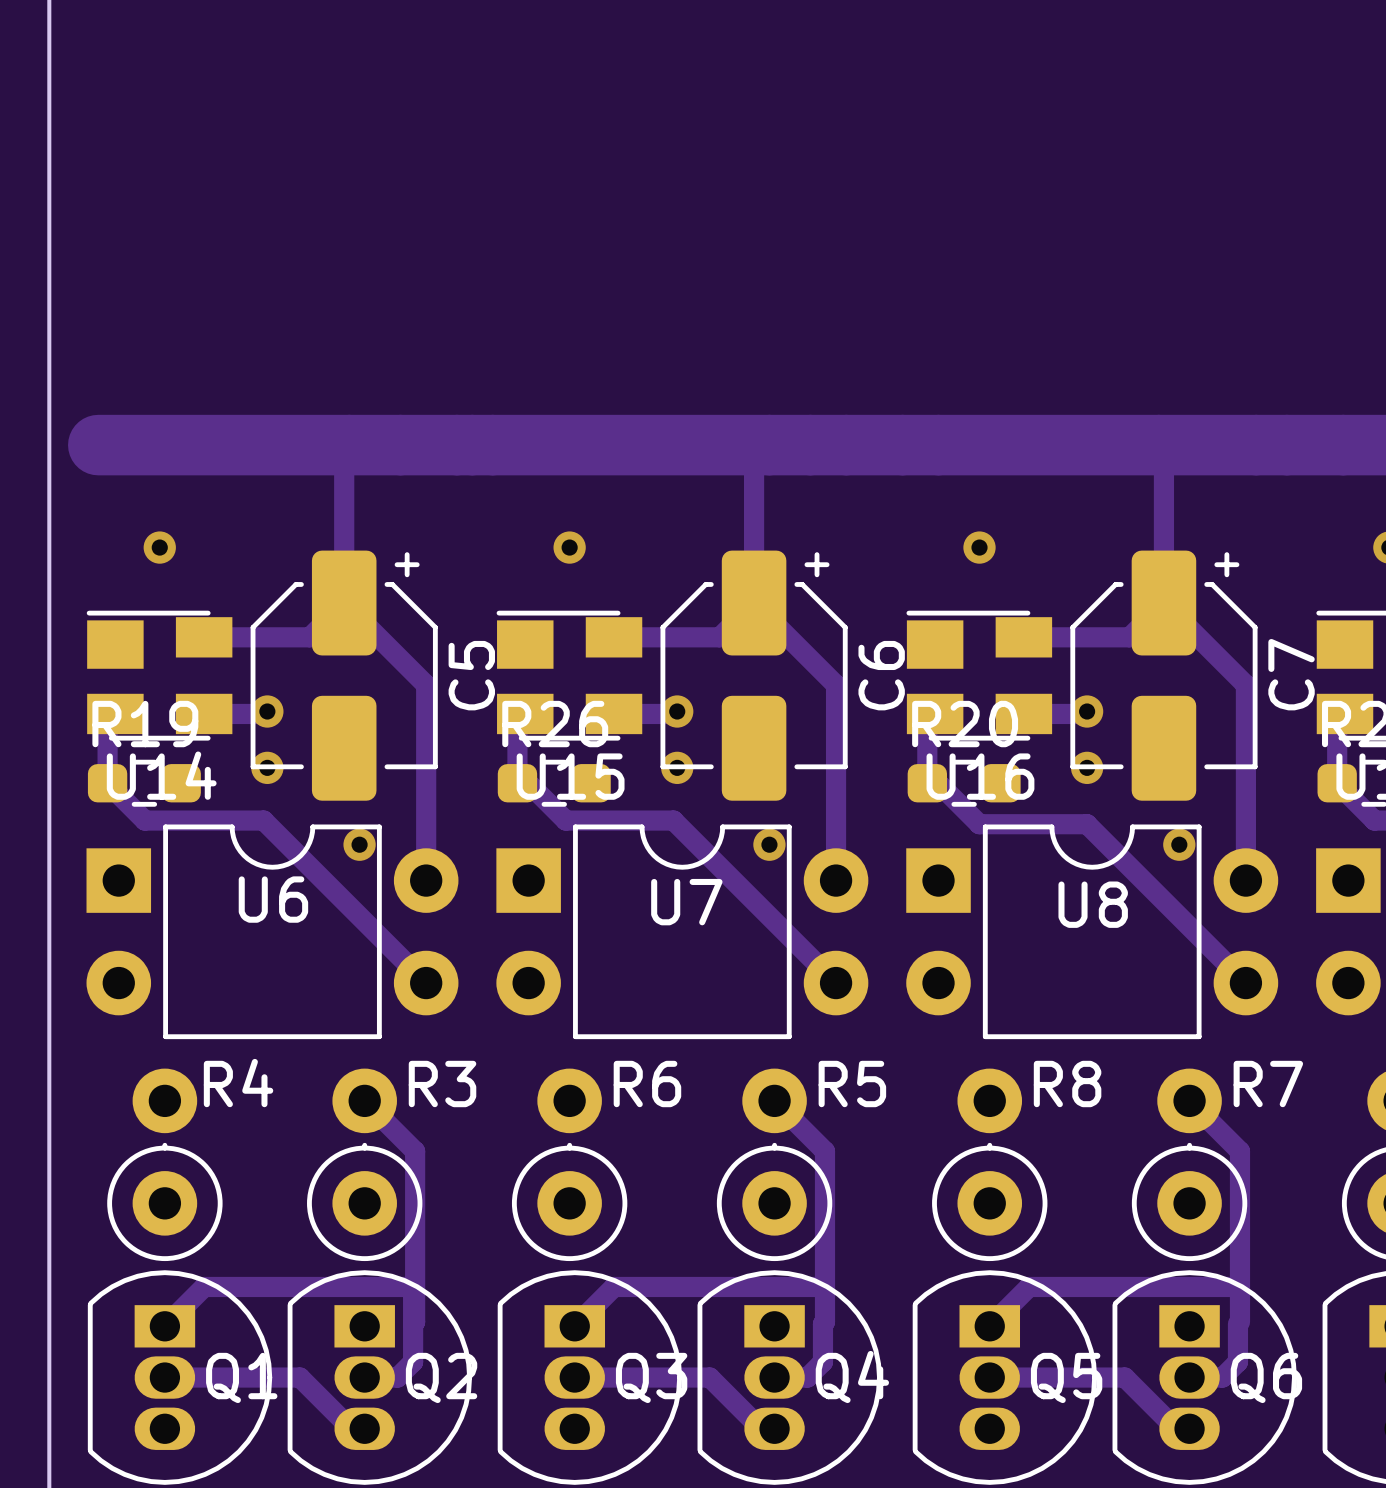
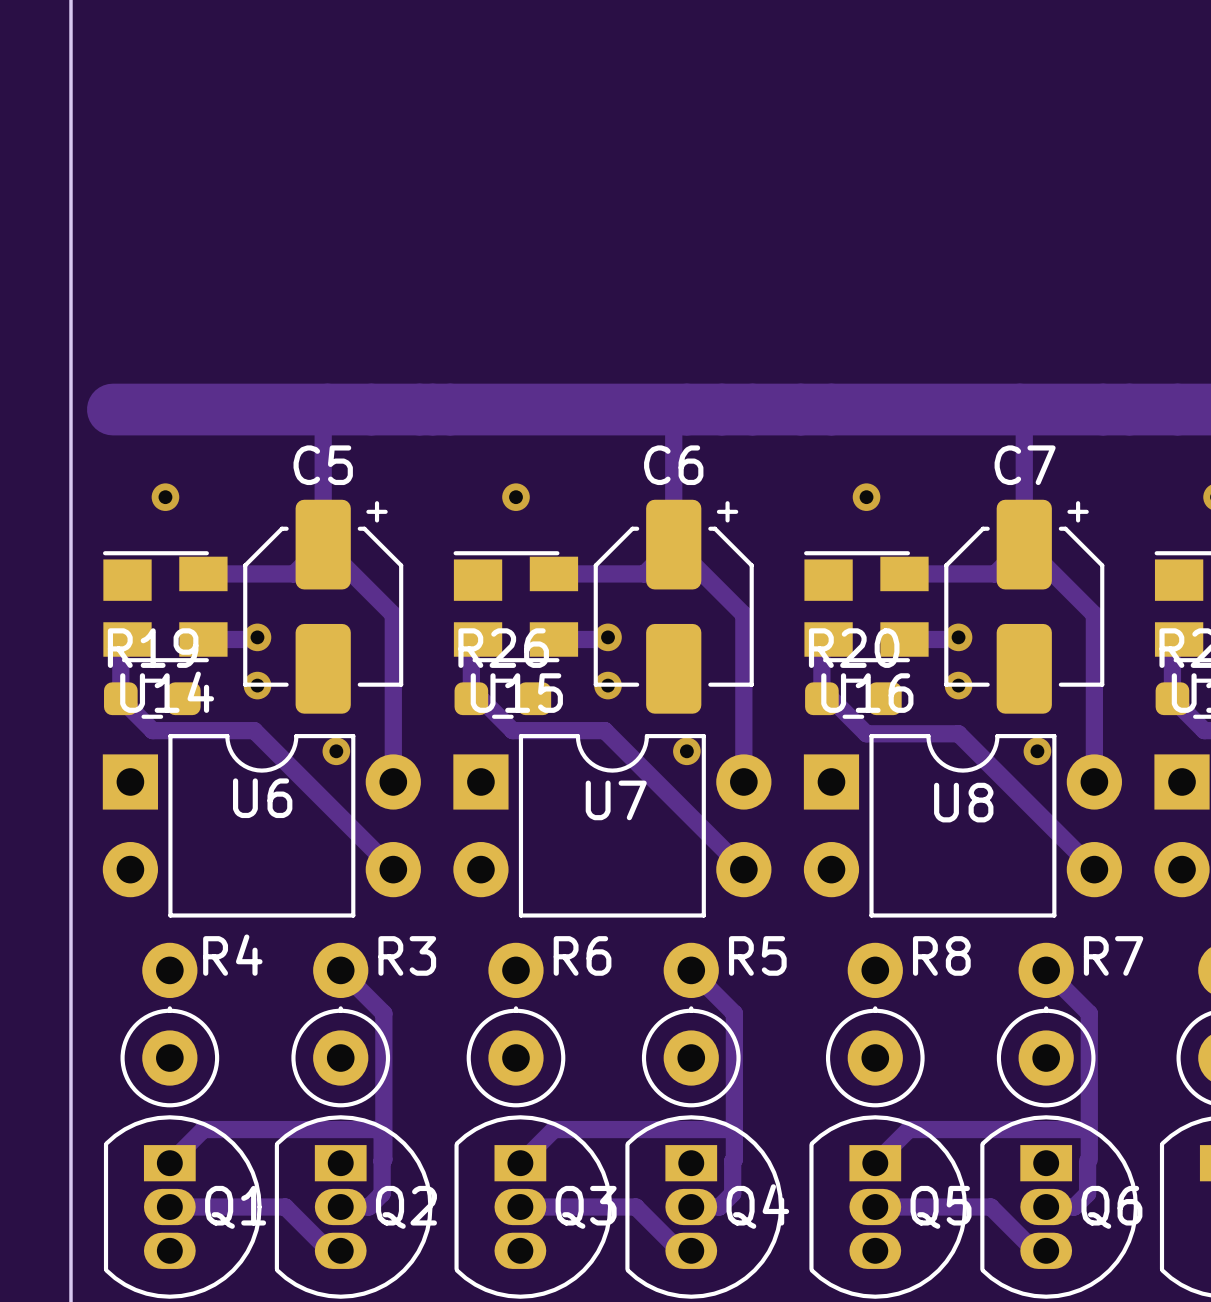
C7 name rotation: 0° (1291, 674) -> 90° clockwise (1025, 465)
C7 name position: C7 (1291, 674) -> C7 (1025, 465)
C5 name rotation: 0° (471, 675) -> 90° clockwise (323, 465)
C5 name position: C5 (471, 675) -> C5 (323, 465)
C6 name rotation: 0° (881, 675) -> 90° clockwise (673, 465)
C6 name position: C6 (881, 675) -> C6 (673, 465)

